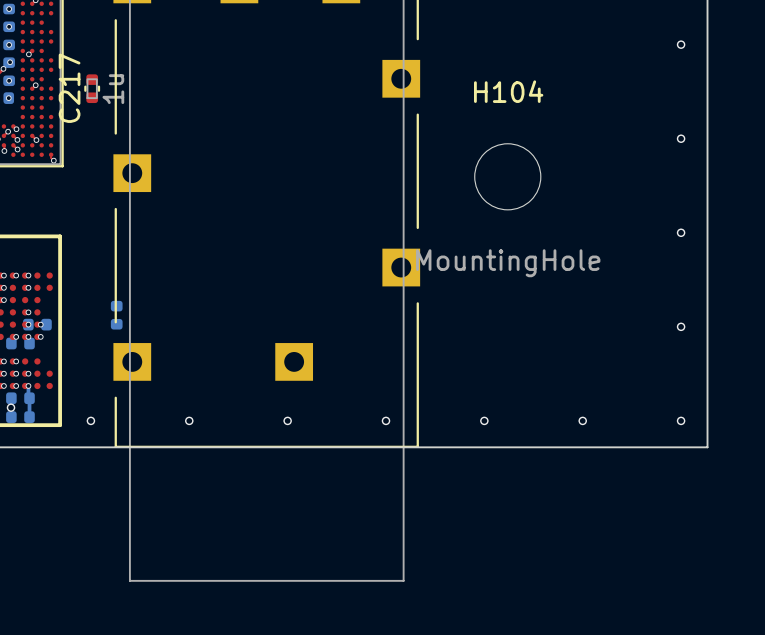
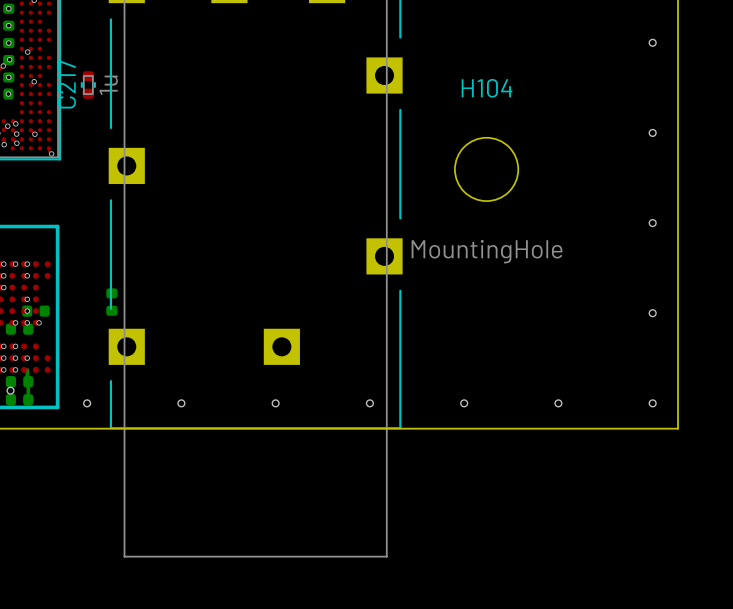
via: (40, 324) -> none
via: (28, 385) -> none

